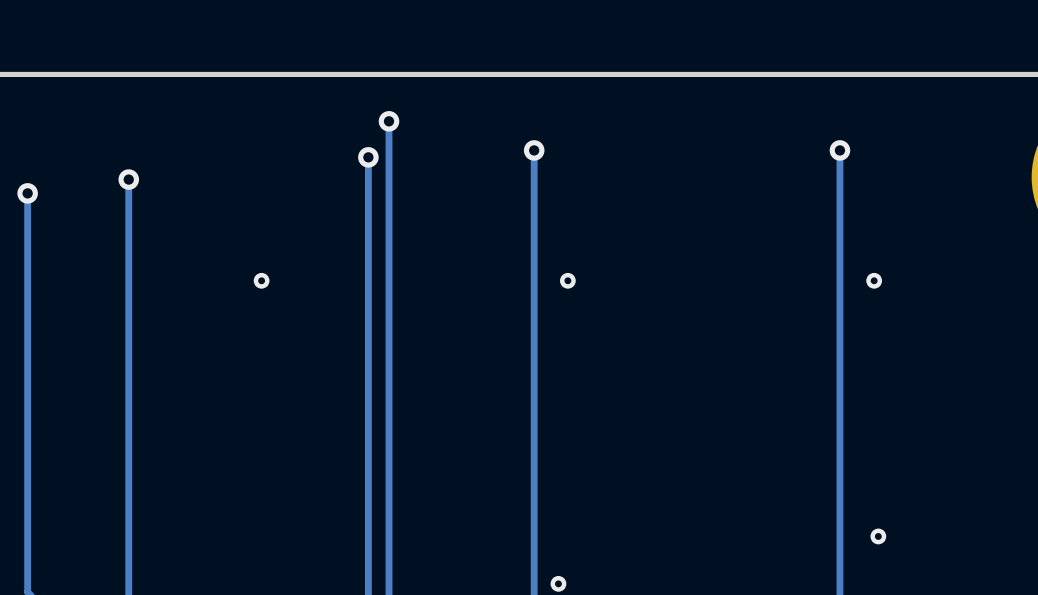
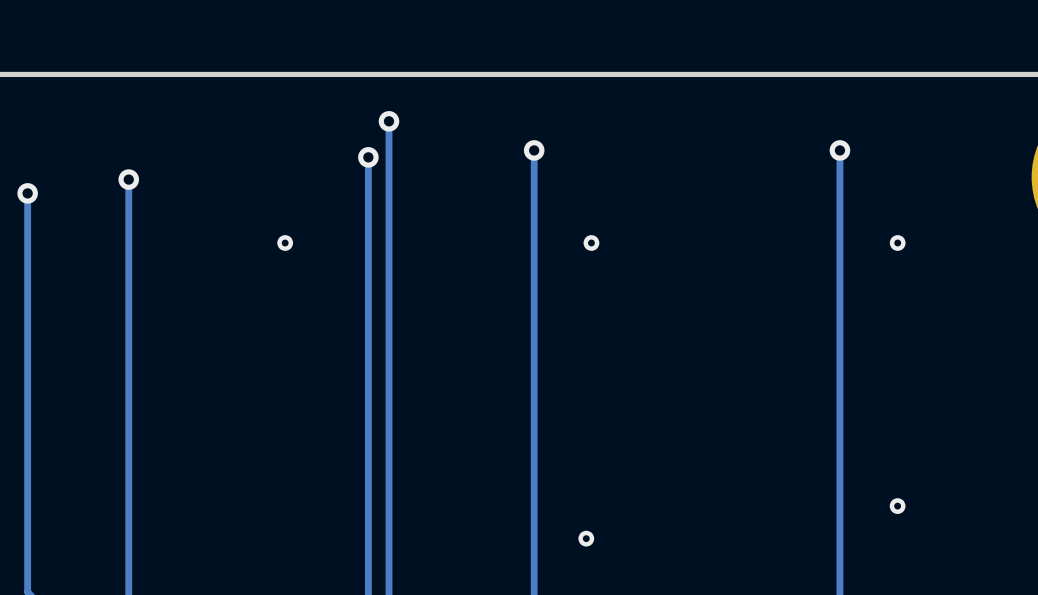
via position: (261, 280) -> (285, 242)
via position: (567, 280) -> (591, 242)
via position: (874, 280) -> (897, 242)
via position: (878, 536) -> (897, 506)
via position: (558, 583) -> (586, 538)

